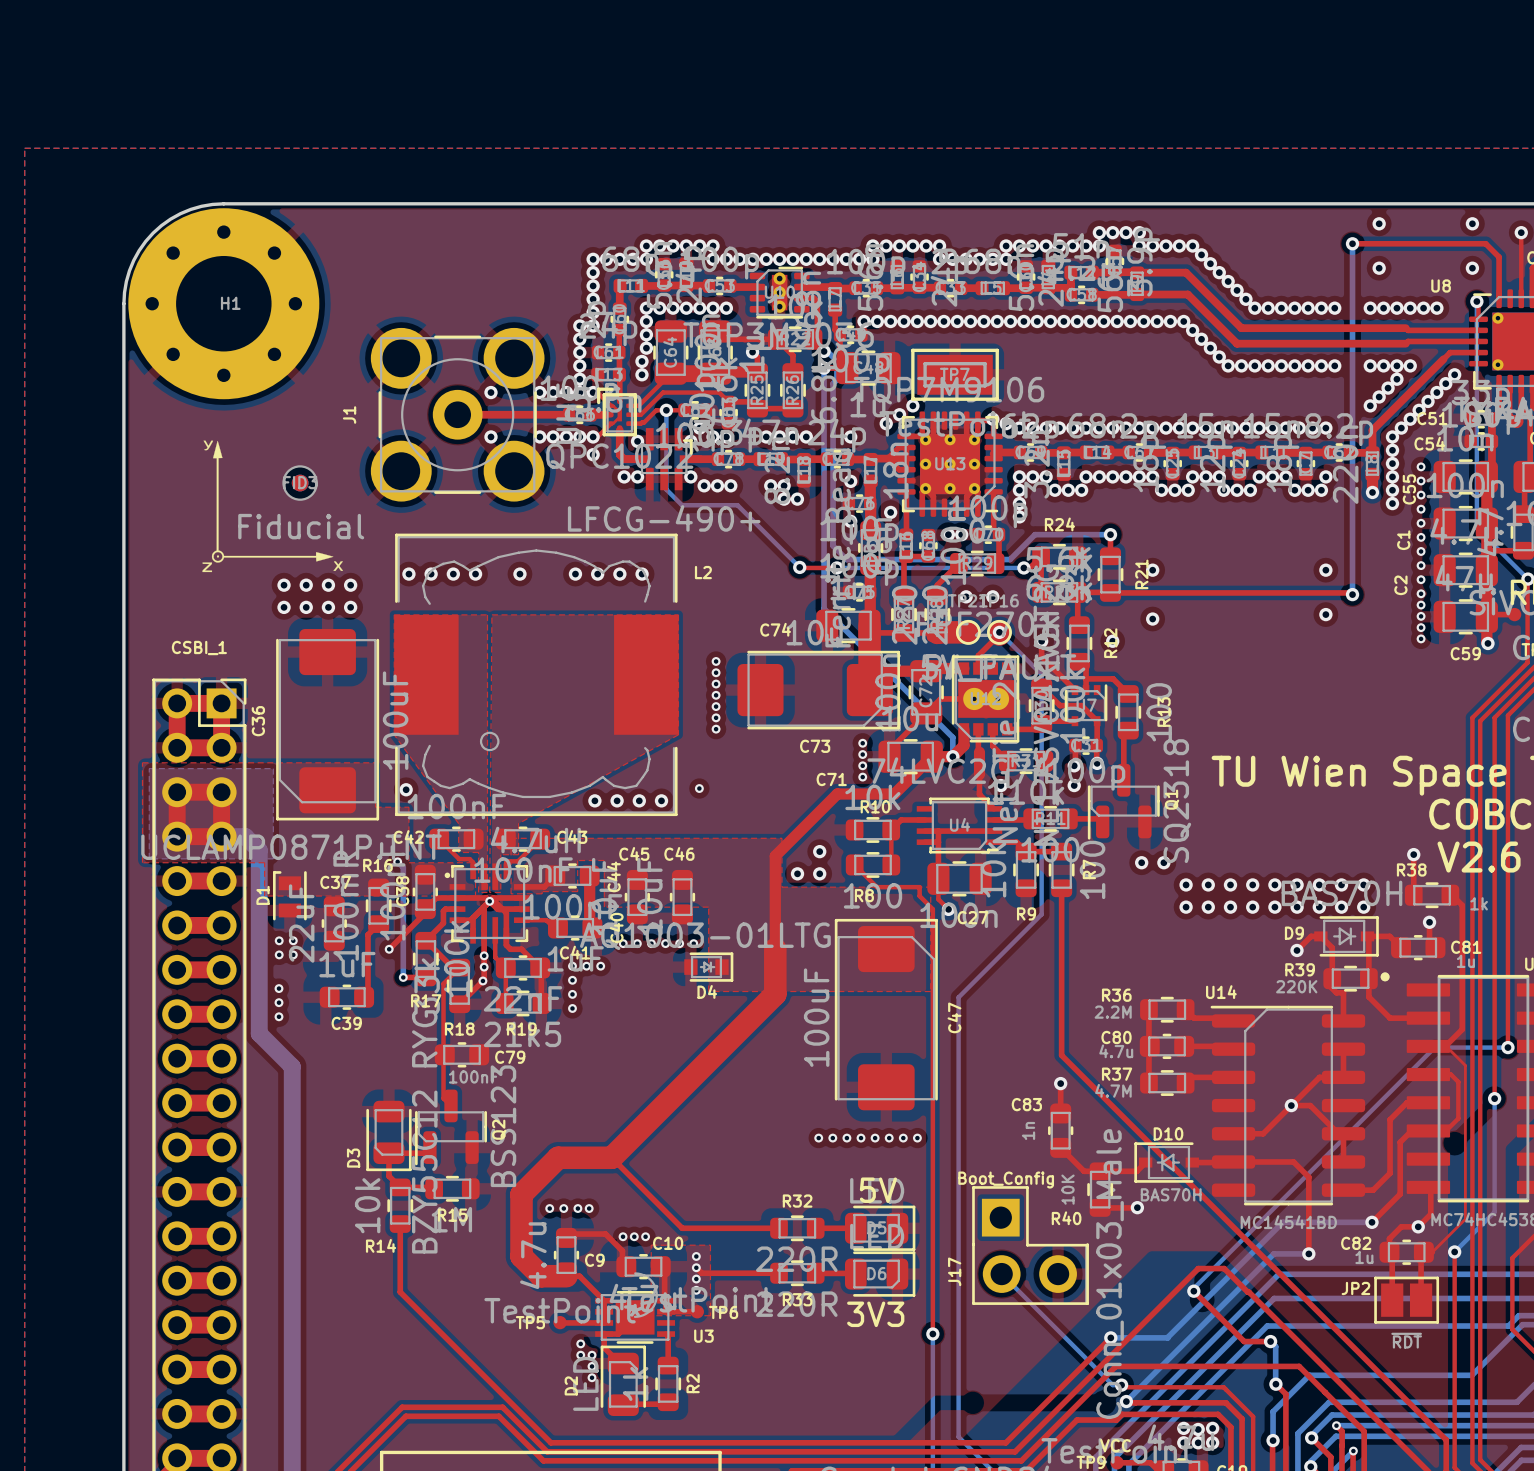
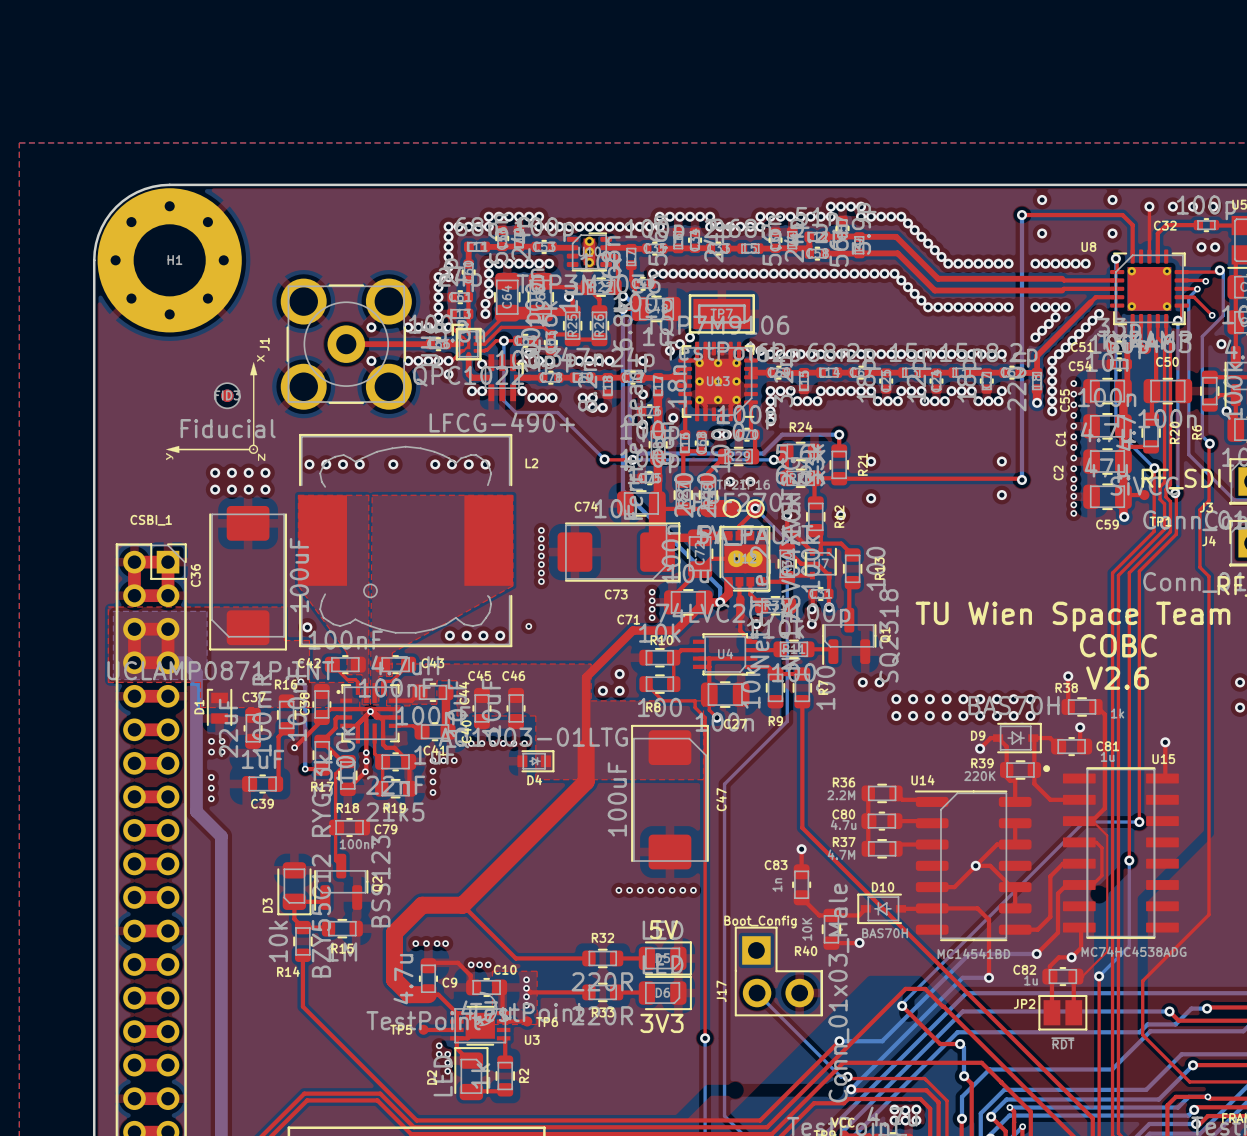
drawing shape: [202, 440, 343, 573] -> [165, 354, 266, 462]

